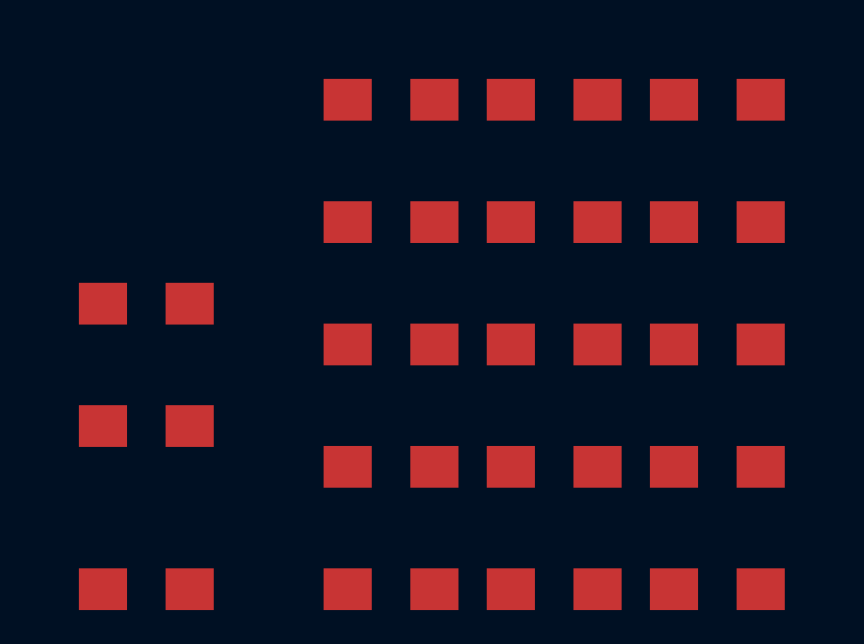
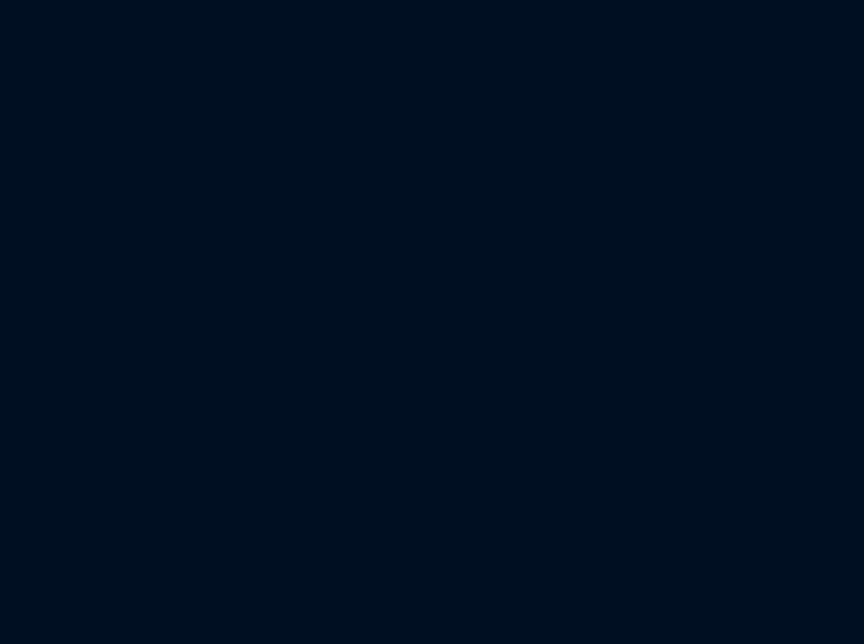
part: (391, 99) -> none
part: (554, 99) -> none
part: (717, 99) -> none
part: (391, 222) -> none
part: (554, 222) -> none
part: (717, 222) -> none
part: (146, 303) -> none
part: (391, 344) -> none
part: (554, 344) -> none
part: (717, 344) -> none
part: (146, 426) -> none
part: (391, 466) -> none
part: (554, 466) -> none
part: (717, 466) -> none
part: (146, 589) -> none
part: (391, 589) -> none
part: (554, 589) -> none
part: (717, 589) -> none

